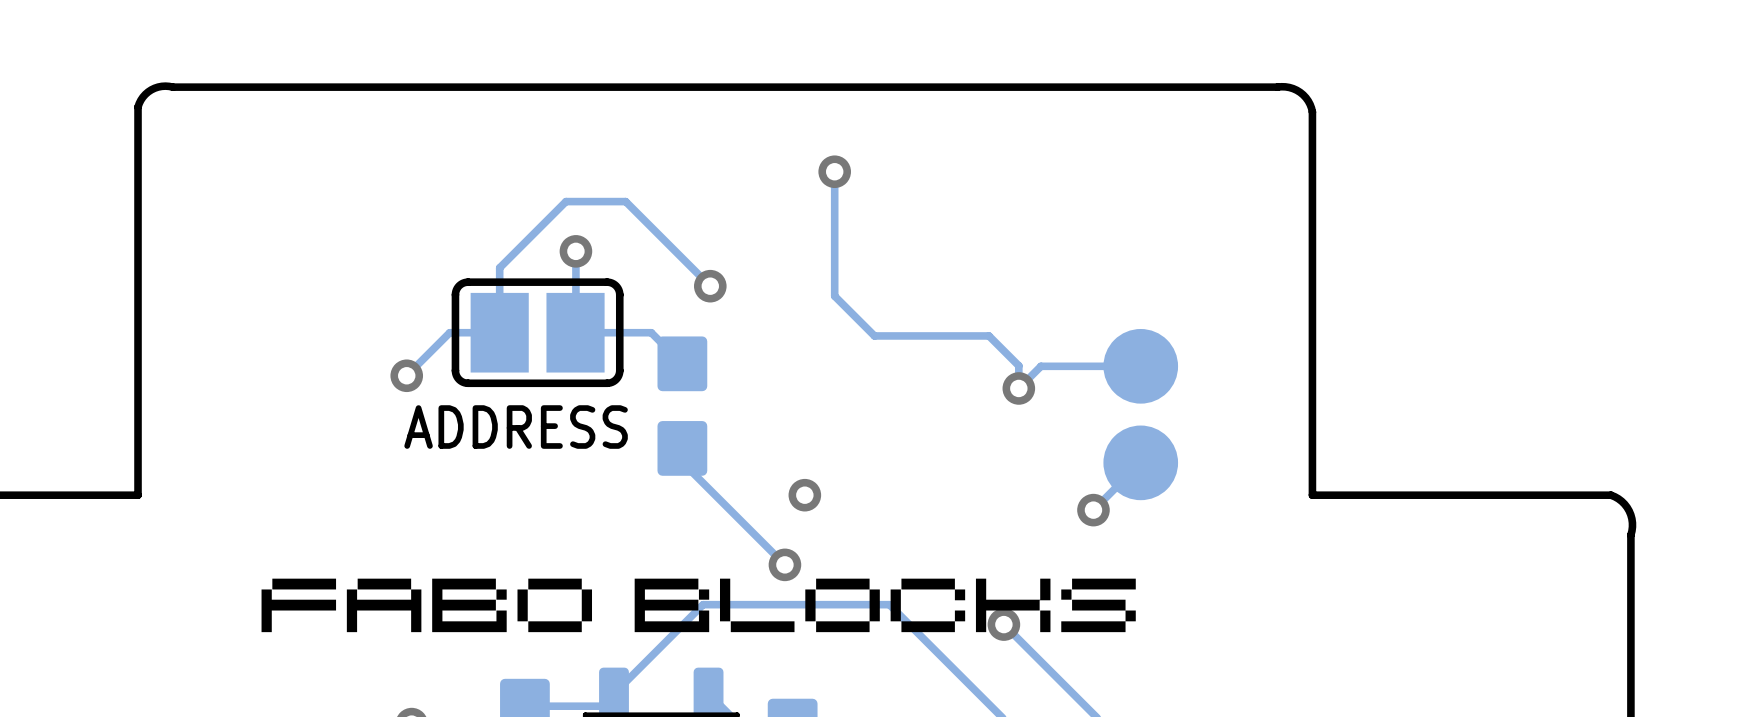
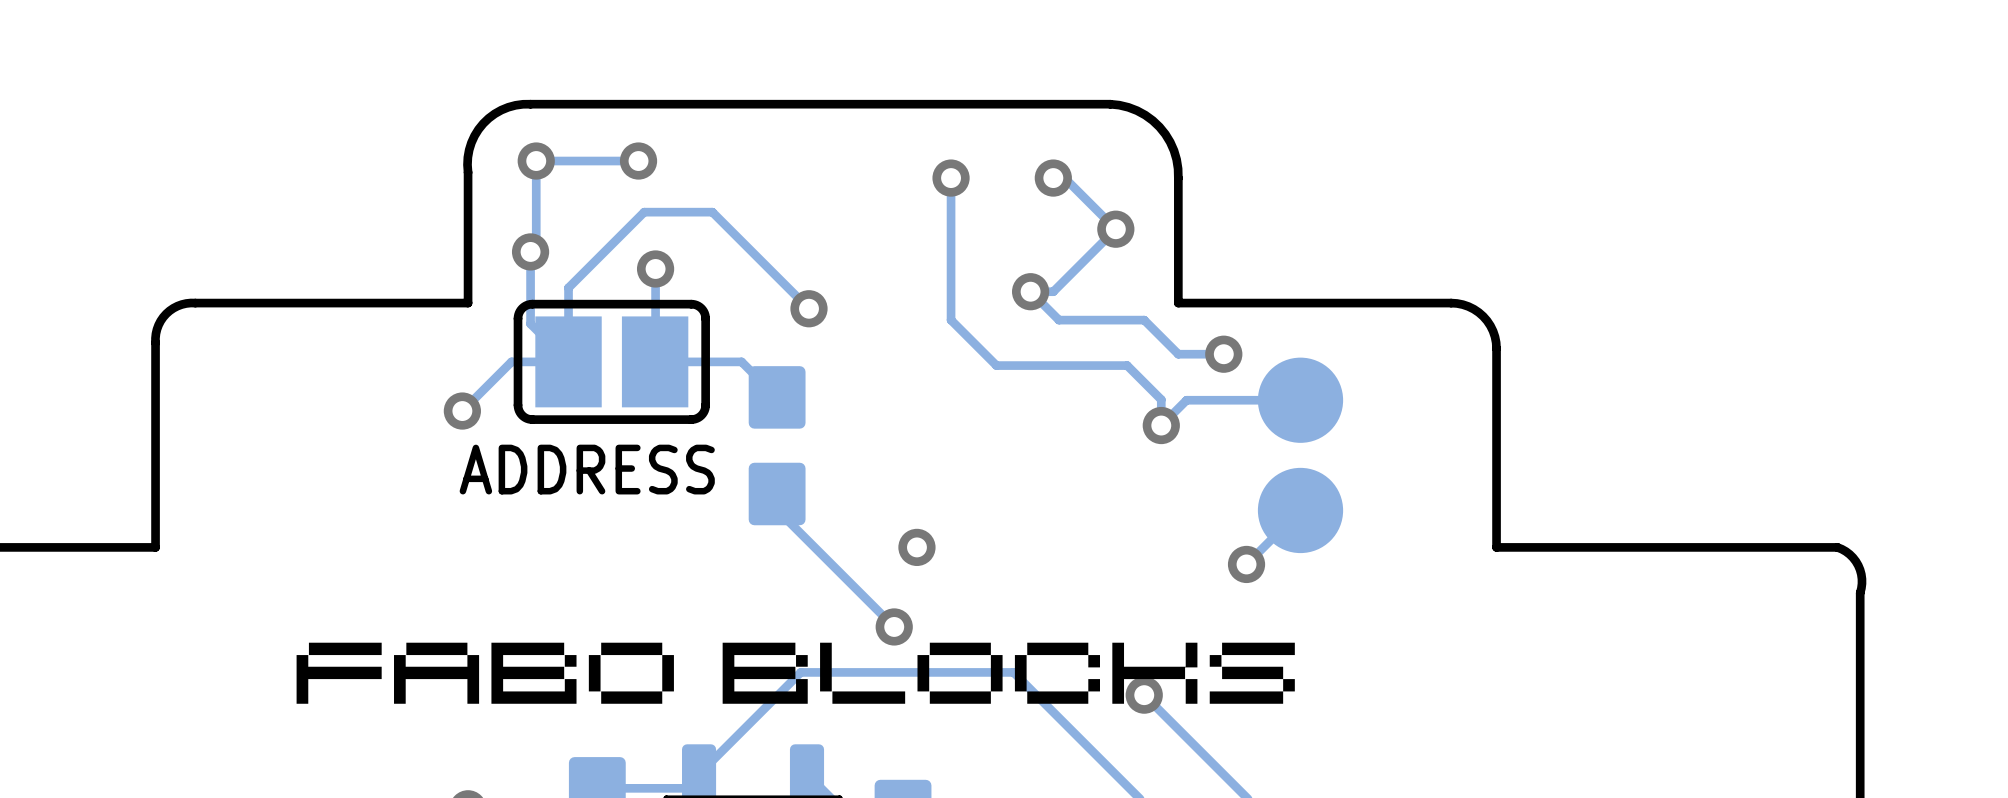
via: none -> (536, 161)
track: none -> (638, 161) (536, 161) (536, 246) (530, 251) (530, 323) (568, 361)
via: none -> (638, 161)
track: none -> (1053, 178) (1064, 178) (1115, 229) (1053, 291) (1030, 291) (1059, 320) (1144, 320) (1178, 354) (1223, 354)
via: none -> (1053, 178)
via: none -> (1115, 229)
via: none -> (530, 251)
via: none -> (1030, 291)
board edge: (138, 316) (138, 107) (145, 94) (158, 87) (1281, 86) (1289, 87) (1300, 92) (1308, 100) (1312, 112) (1312, 321) -> (155, 342) (157, 329) (163, 317) (173, 308) (186, 303) (468, 303) (467, 164) (469, 149) (474, 135) (488, 118) (501, 110) (515, 105) (1110, 104) (1128, 107) (1152, 120) (1165, 134) (1174, 150) (1178, 168) (1178, 303) (1457, 303) (1473, 309) (1483, 316) (1493, 331) (1496, 348)
via: none -> (1223, 354)

